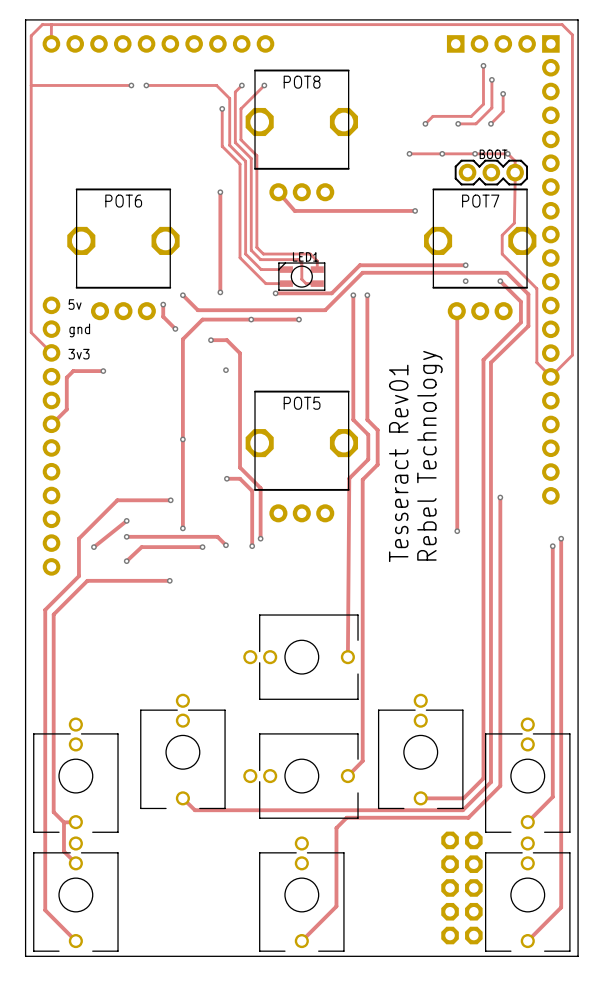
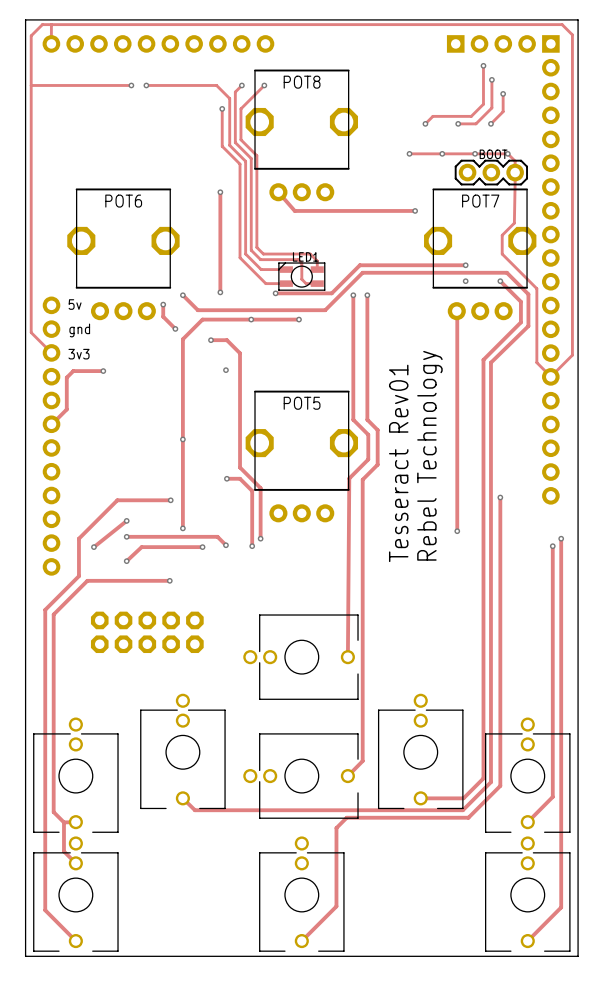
part: none -> (147, 632)
part: (461, 887) -> none

